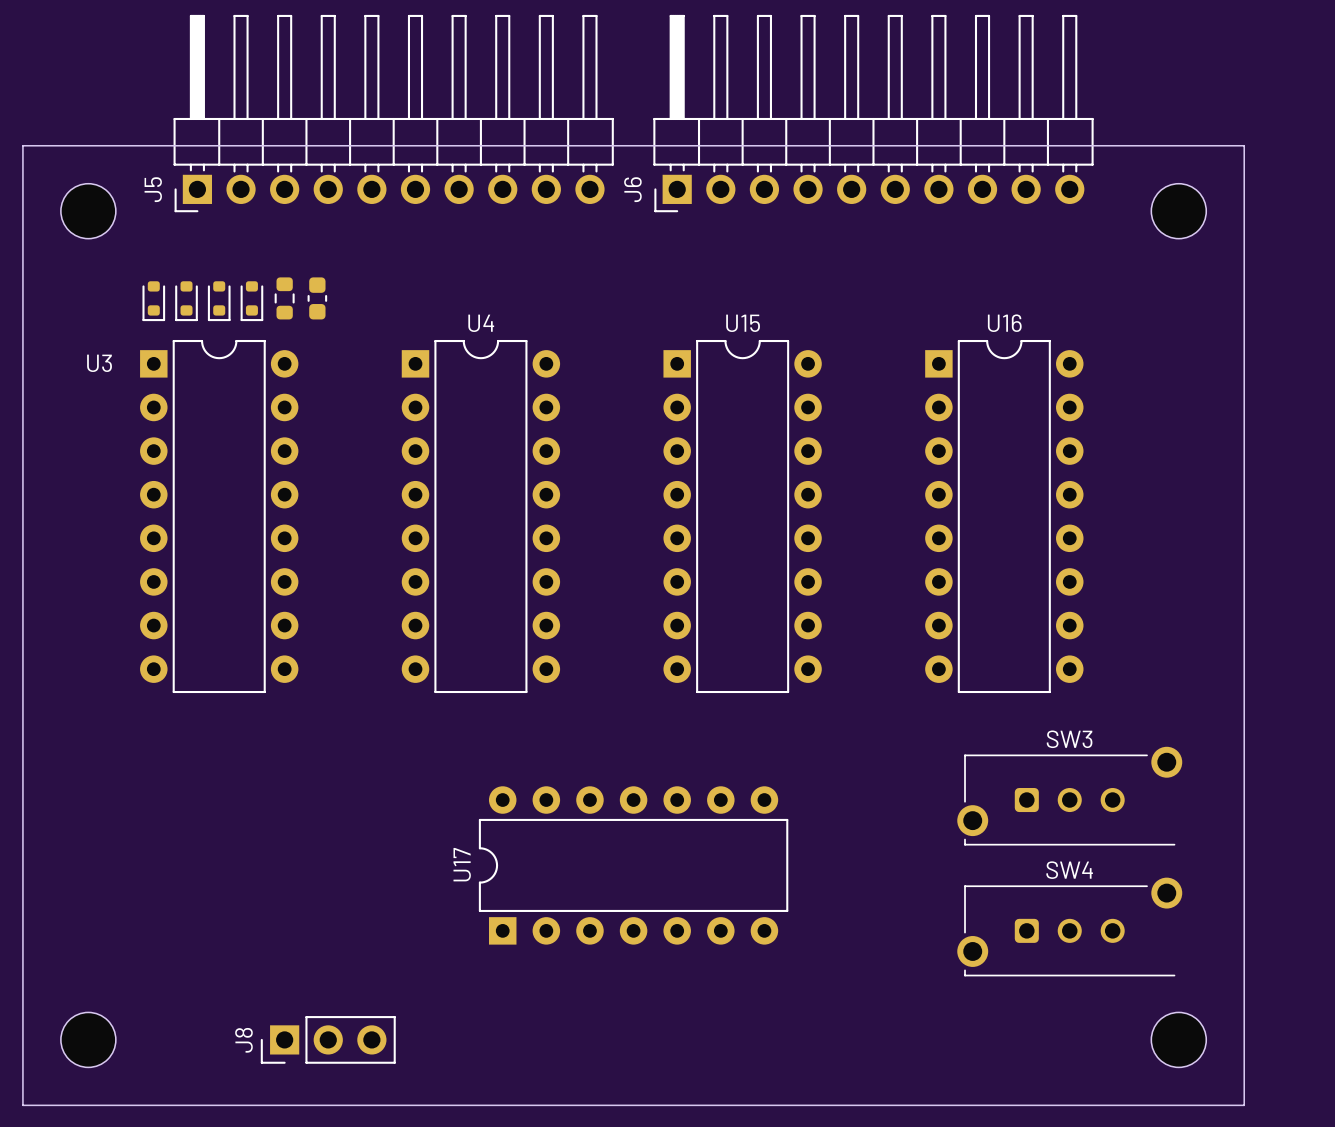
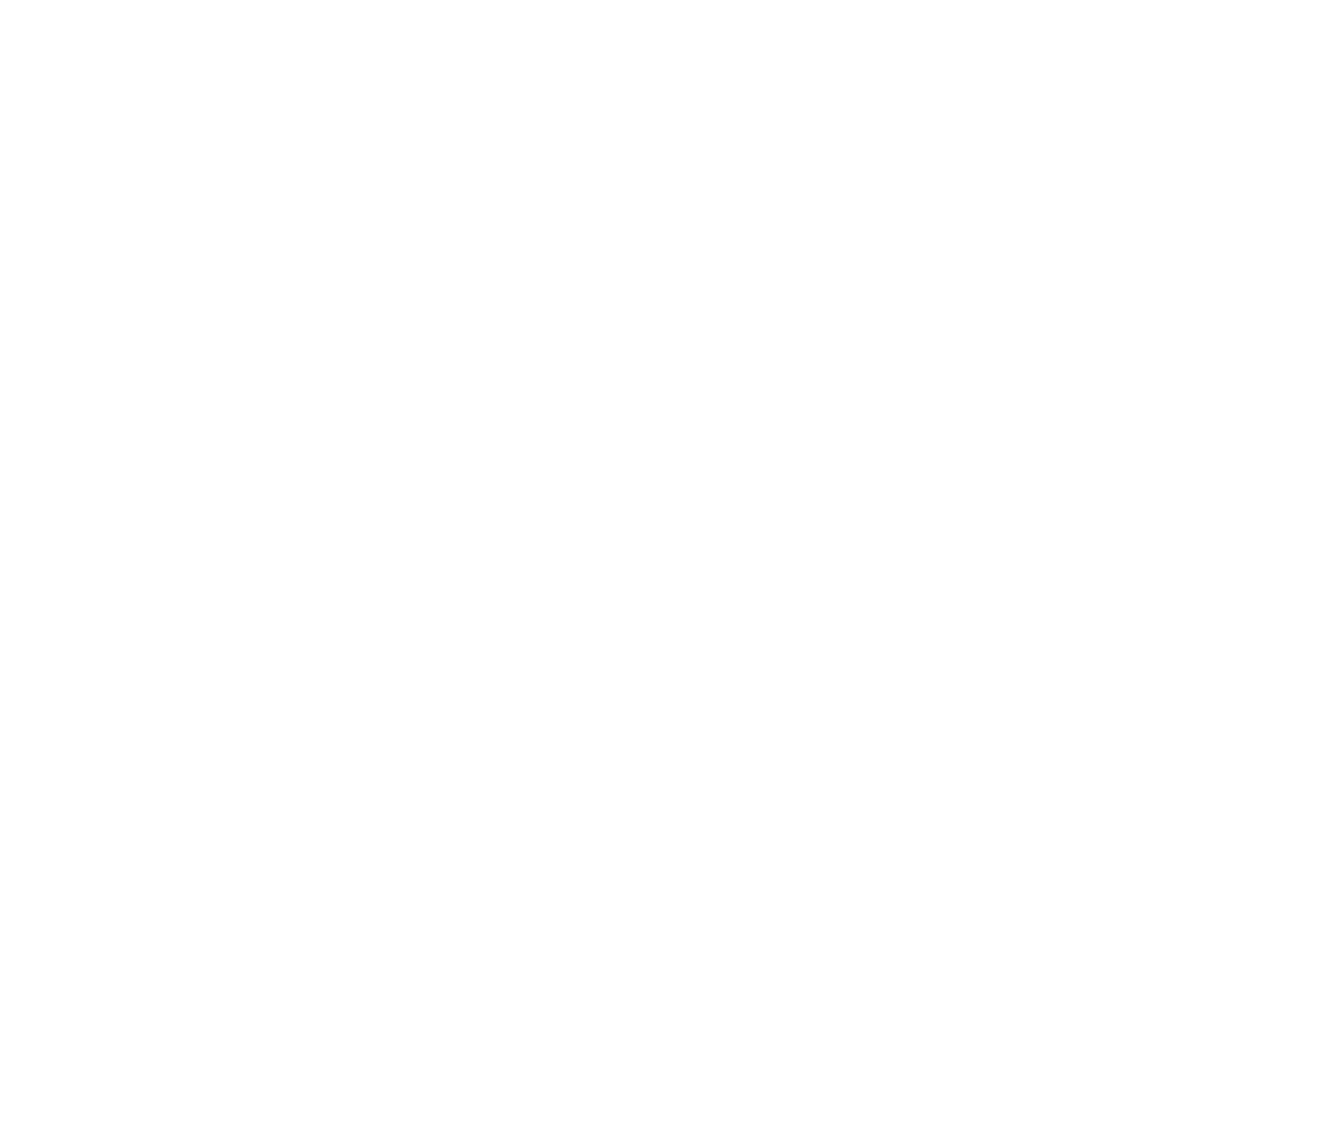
J5: (393, 113) -> none
J6: (873, 113) -> none
board edge: (22, 145) (1244, 145) (1244, 1105) (22, 1105) (22, 145) -> none
part: (88, 211) -> none
part: (1178, 211) -> none
part: (284, 298) -> none
part: (317, 298) -> none
part: (153, 301) -> none
part: (186, 301) -> none
part: (219, 301) -> none
part: (251, 301) -> none
U3: (219, 516) -> none
U4: (480, 516) -> none
U15: (742, 516) -> none
U16: (1004, 516) -> none
SW3: (1069, 796) -> none
U17: (633, 865) -> none
SW4: (1069, 927) -> none
part: (88, 1039) -> none
J8: (328, 1039) -> none
part: (1178, 1039) -> none

